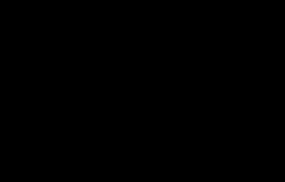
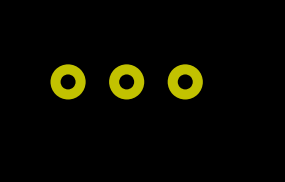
part: none -> (126, 81)

